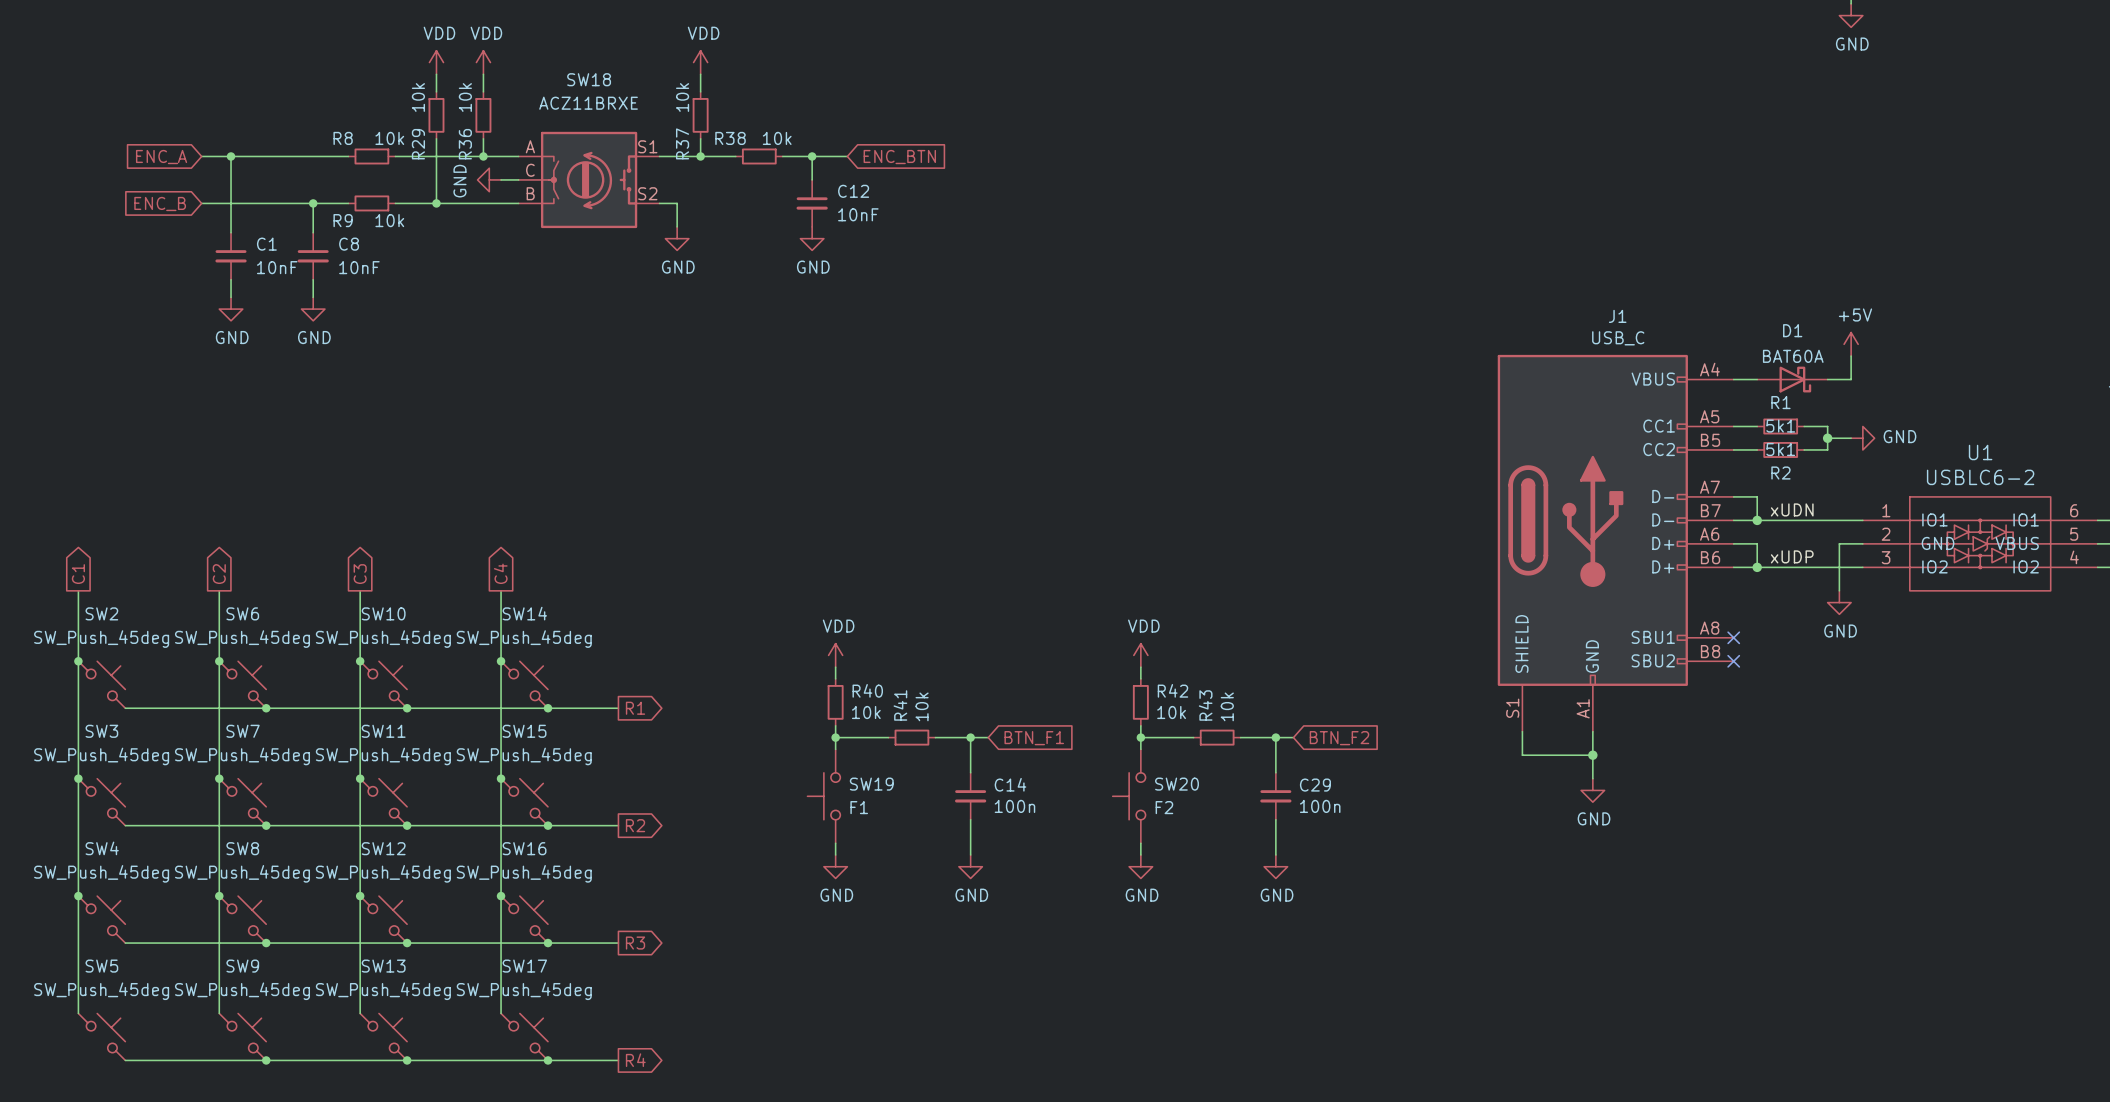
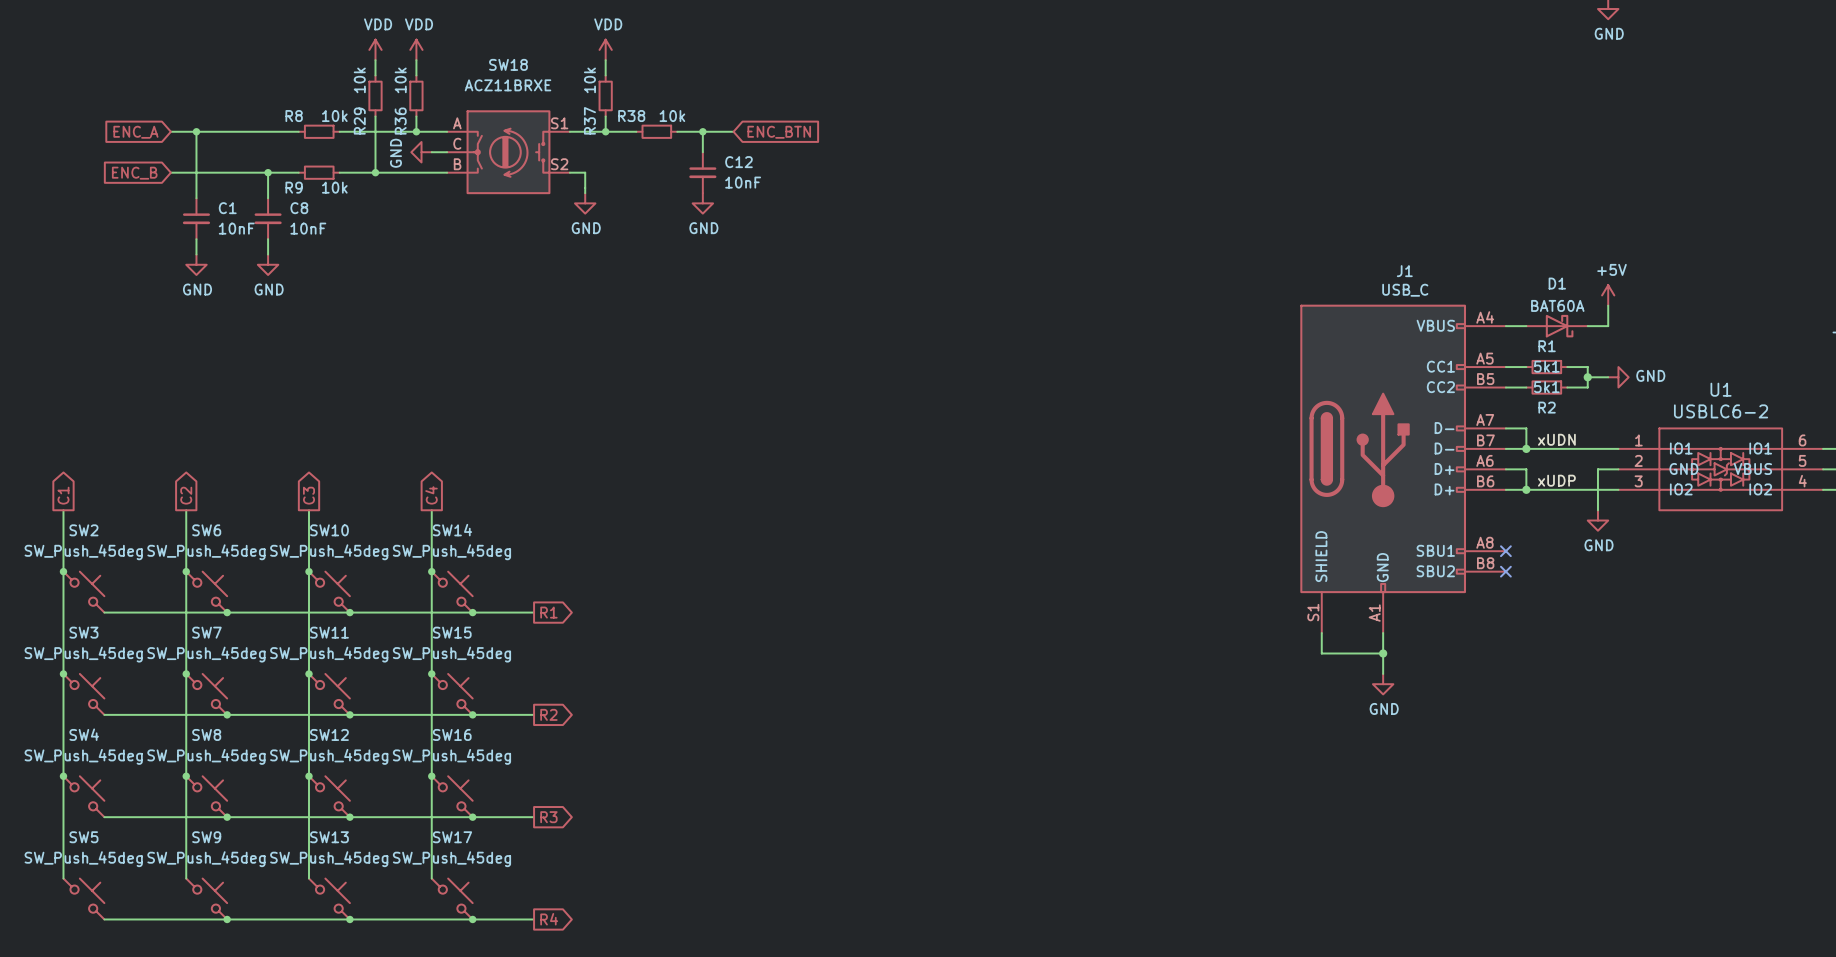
power symbol: VDD (835, 655) -> none
power symbol: VDD (1140, 655) -> none
wire: (835, 667) (835, 678) -> none
wire: (1140, 667) (1140, 678) -> none
R40: 10k (835, 702) -> none
R42: 10k (1140, 702) -> none
wire: (835, 725) (835, 749) -> none
wire: (1140, 725) (1140, 749) -> none
wire: (835, 737) (888, 737) -> none
junction: (835, 737) -> none
R41: 10k (911, 737) -> none
wire: (935, 737) (988, 737) -> none
wire: (970, 737) (970, 772) -> none
junction: (970, 737) -> none
wire: (1140, 737) (1193, 737) -> none
junction: (1140, 737) -> none
R43: 10k (1217, 737) -> none
wire: (1240, 737) (1293, 737) -> none
wire: (1275, 737) (1275, 772) -> none
junction: (1275, 737) -> none
global label: BTN_F1 (1034, 738) -> none
global label: BTN_F2 (1339, 738) -> none
SW19: F1 (823, 796) -> none
C14: 100n (970, 796) -> none
SW20: F2 (1129, 796) -> none
C29: 100n (1275, 796) -> none
wire: (970, 819) (970, 854) -> none
wire: (1275, 819) (1275, 854) -> none
wire: (835, 843) (835, 854) -> none
wire: (1140, 843) (1140, 854) -> none
power symbol: GND (835, 866) -> none
power symbol: GND (970, 866) -> none
power symbol: GND (1140, 866) -> none
power symbol: GND (1275, 866) -> none

